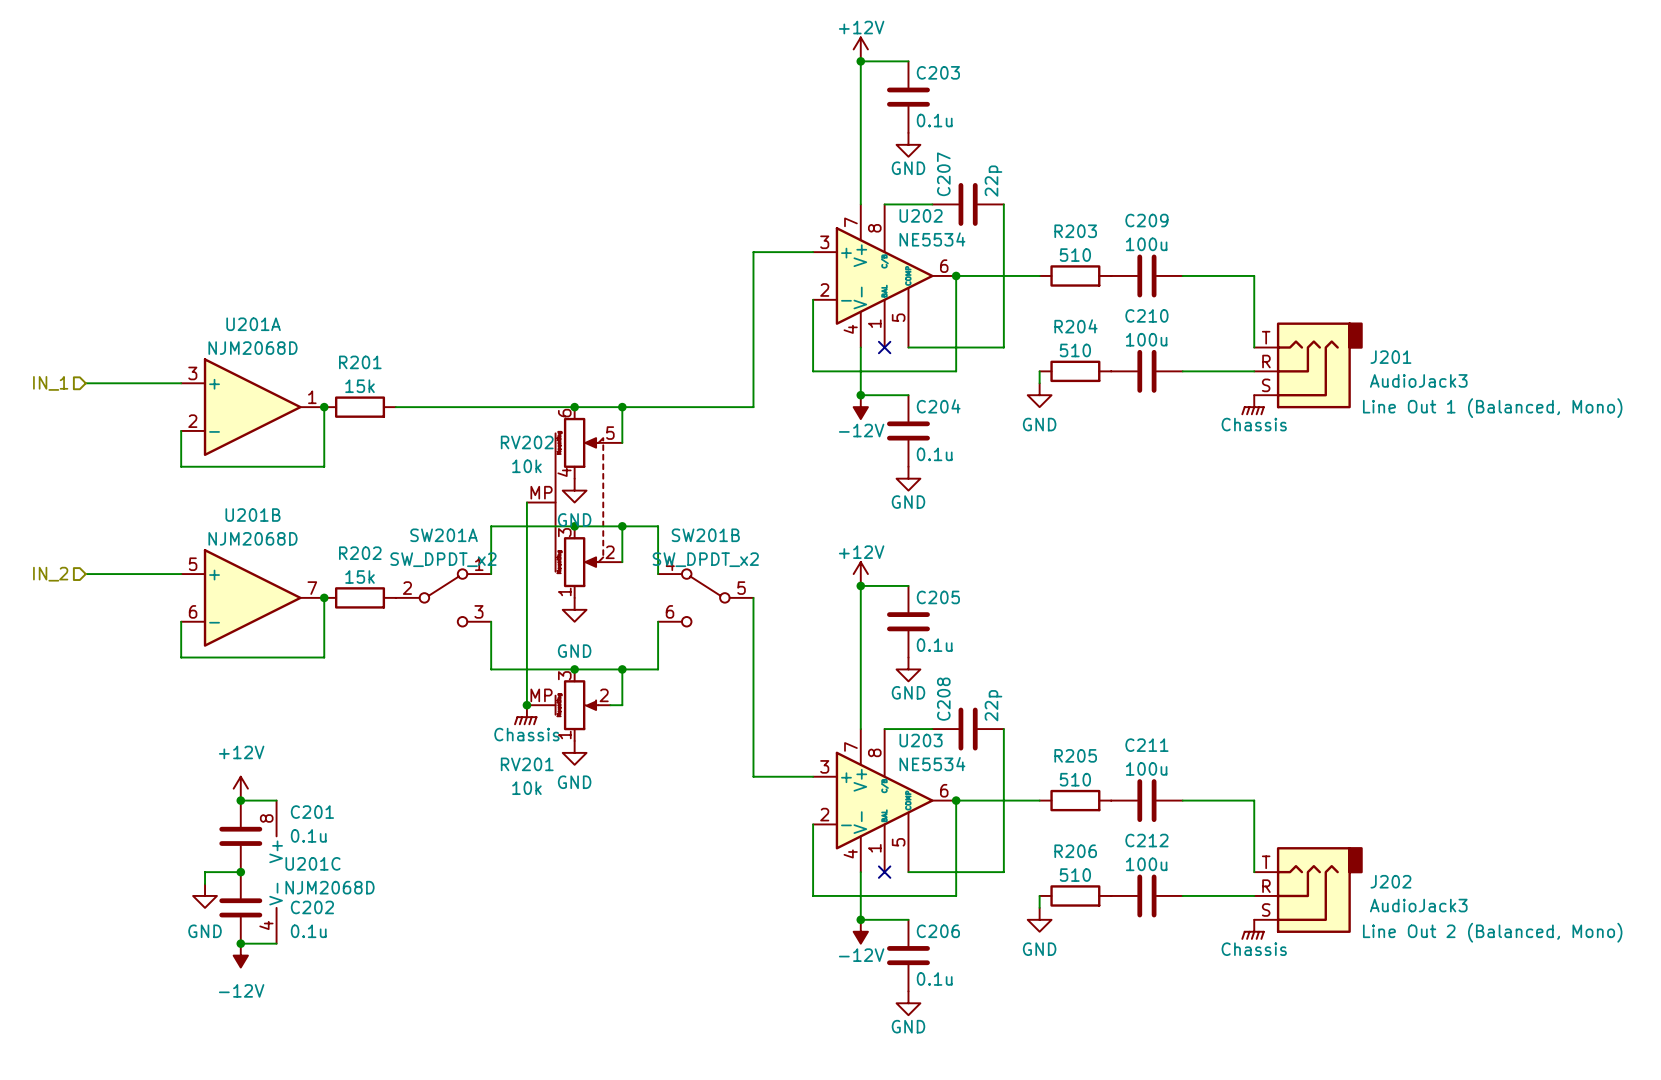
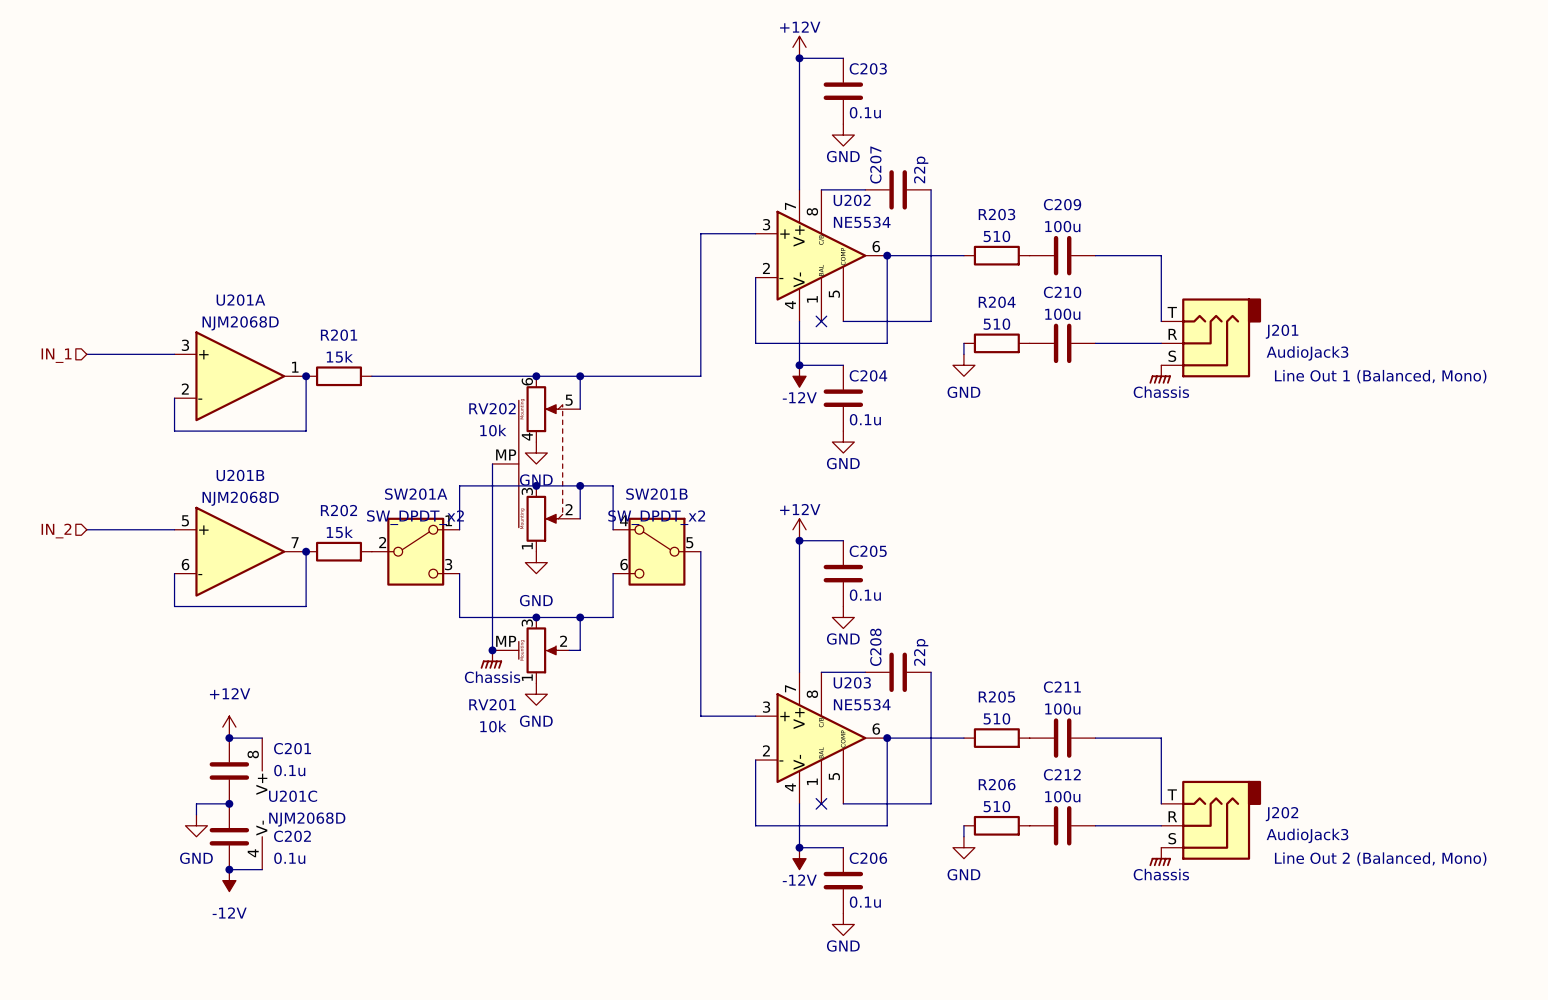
SW201A symbol: [395, 569, 492, 627] -> [371, 517, 460, 586]
SW201B symbol: [658, 569, 754, 627] -> [613, 517, 701, 586]

